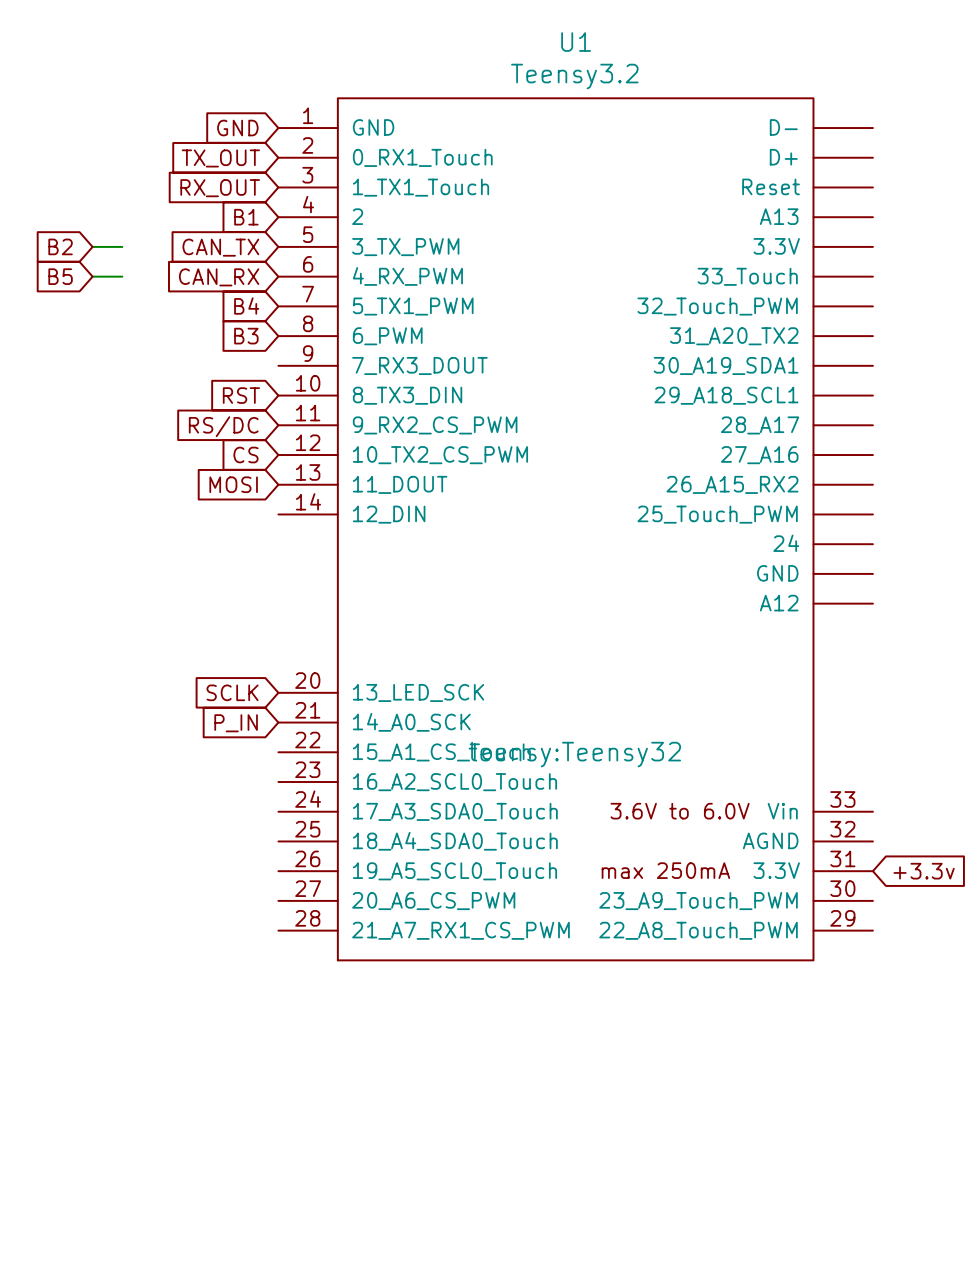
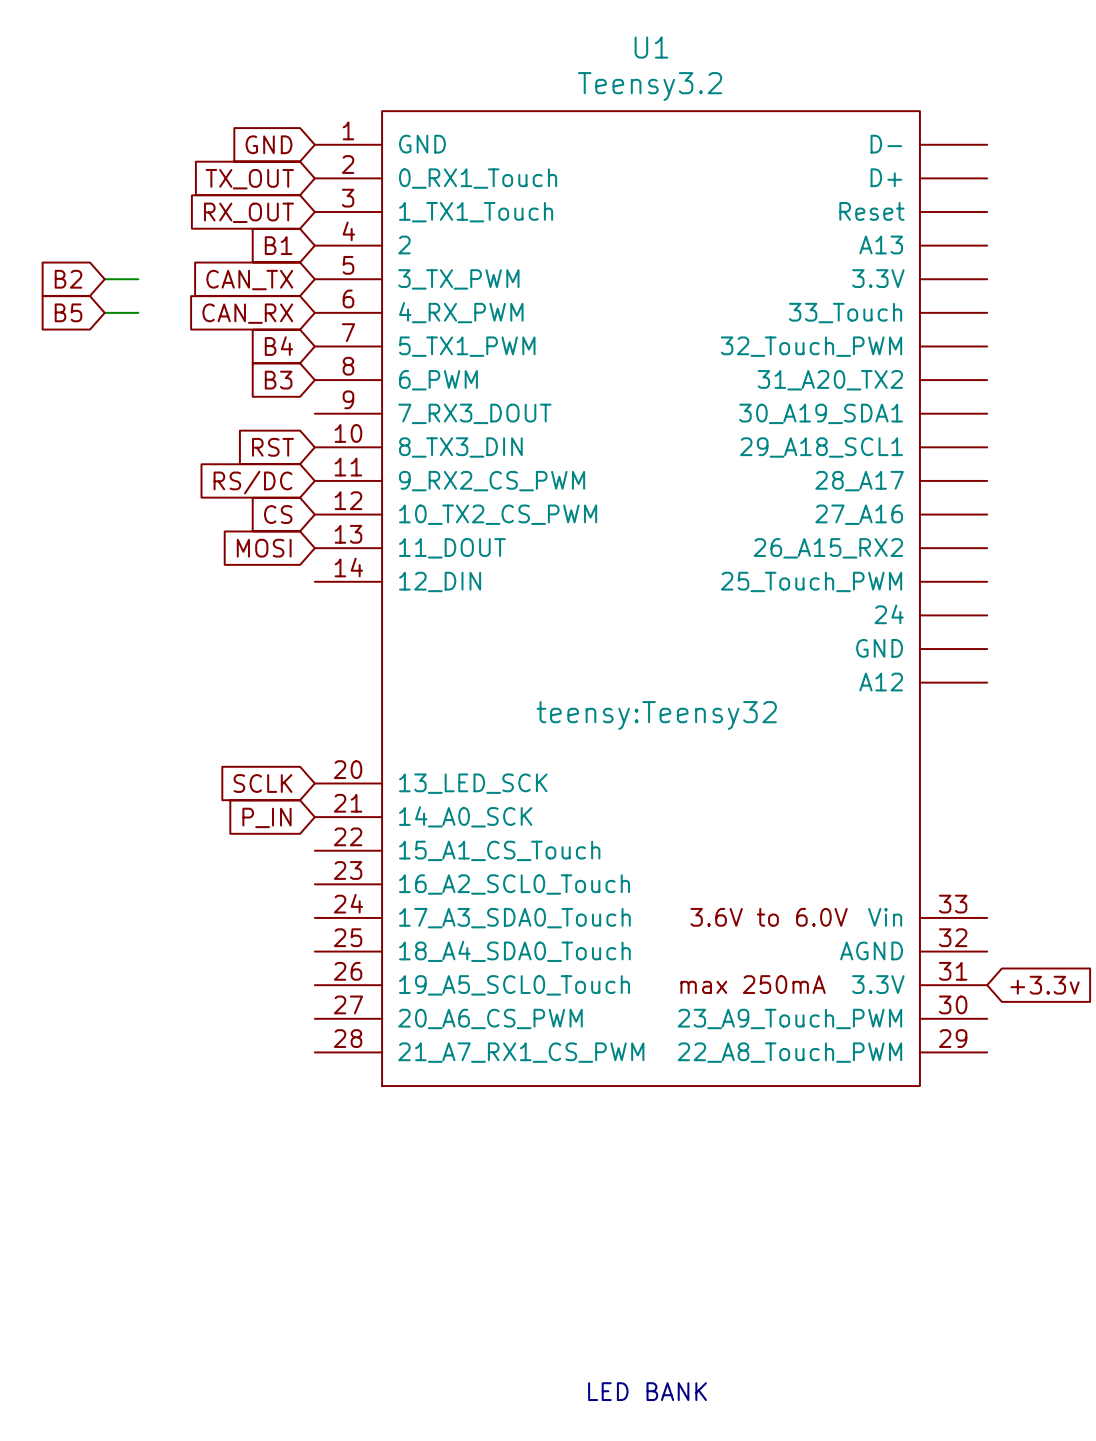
U1 text position: teensy:Teensy32 (574, 754) -> teensy:Teensy32 (656, 715)
text: none -> LED BANK (647, 1391)

